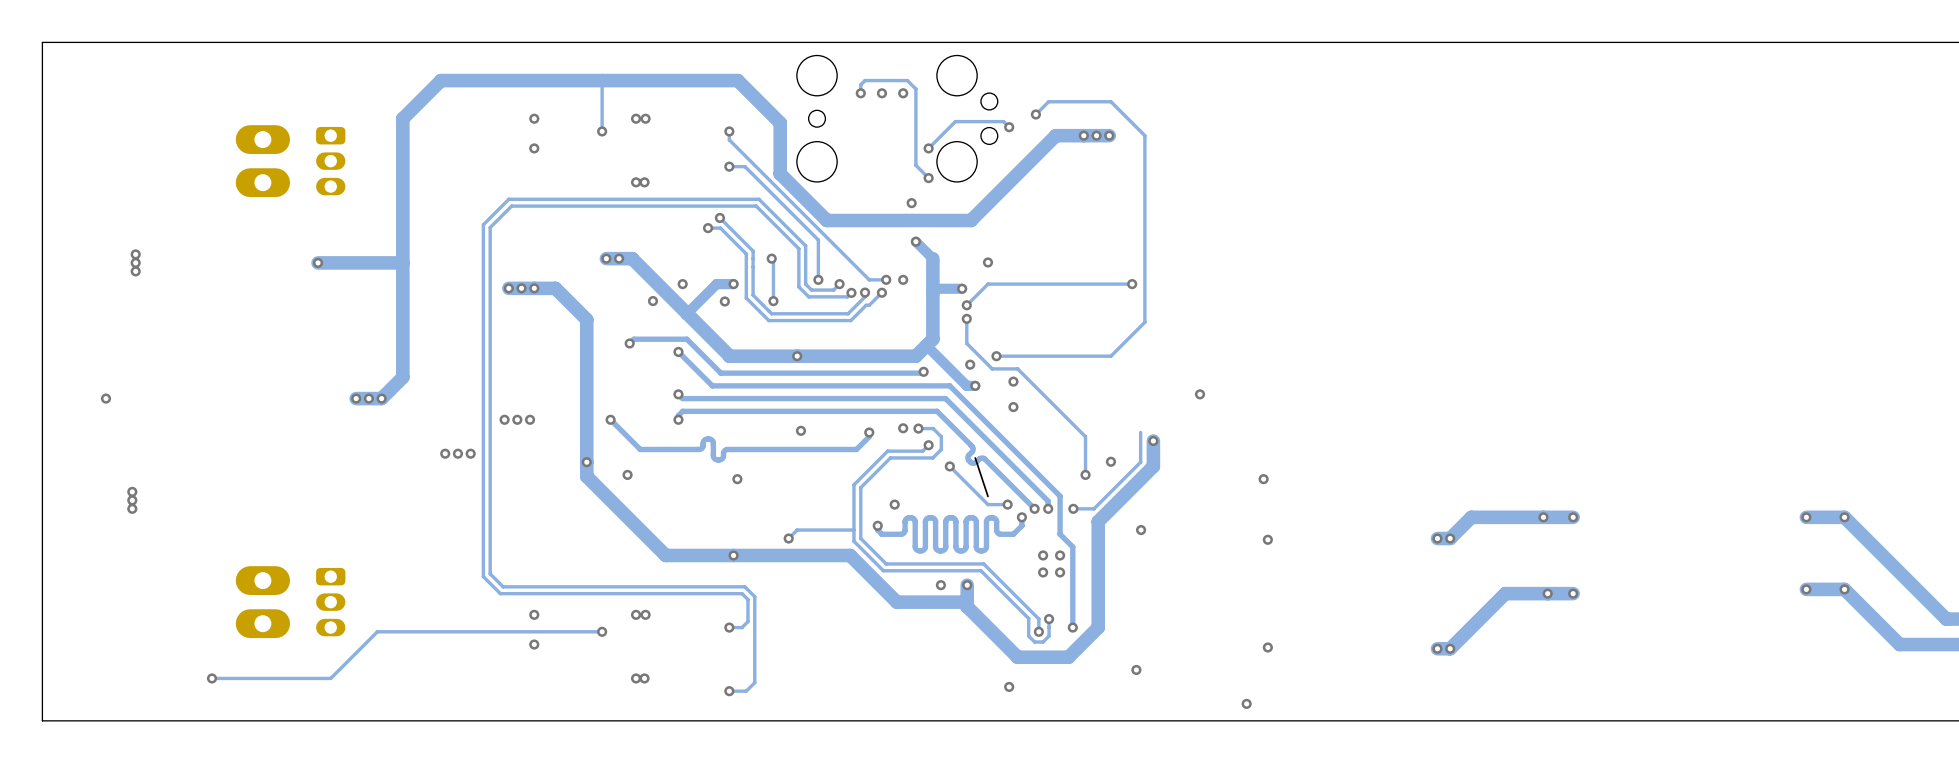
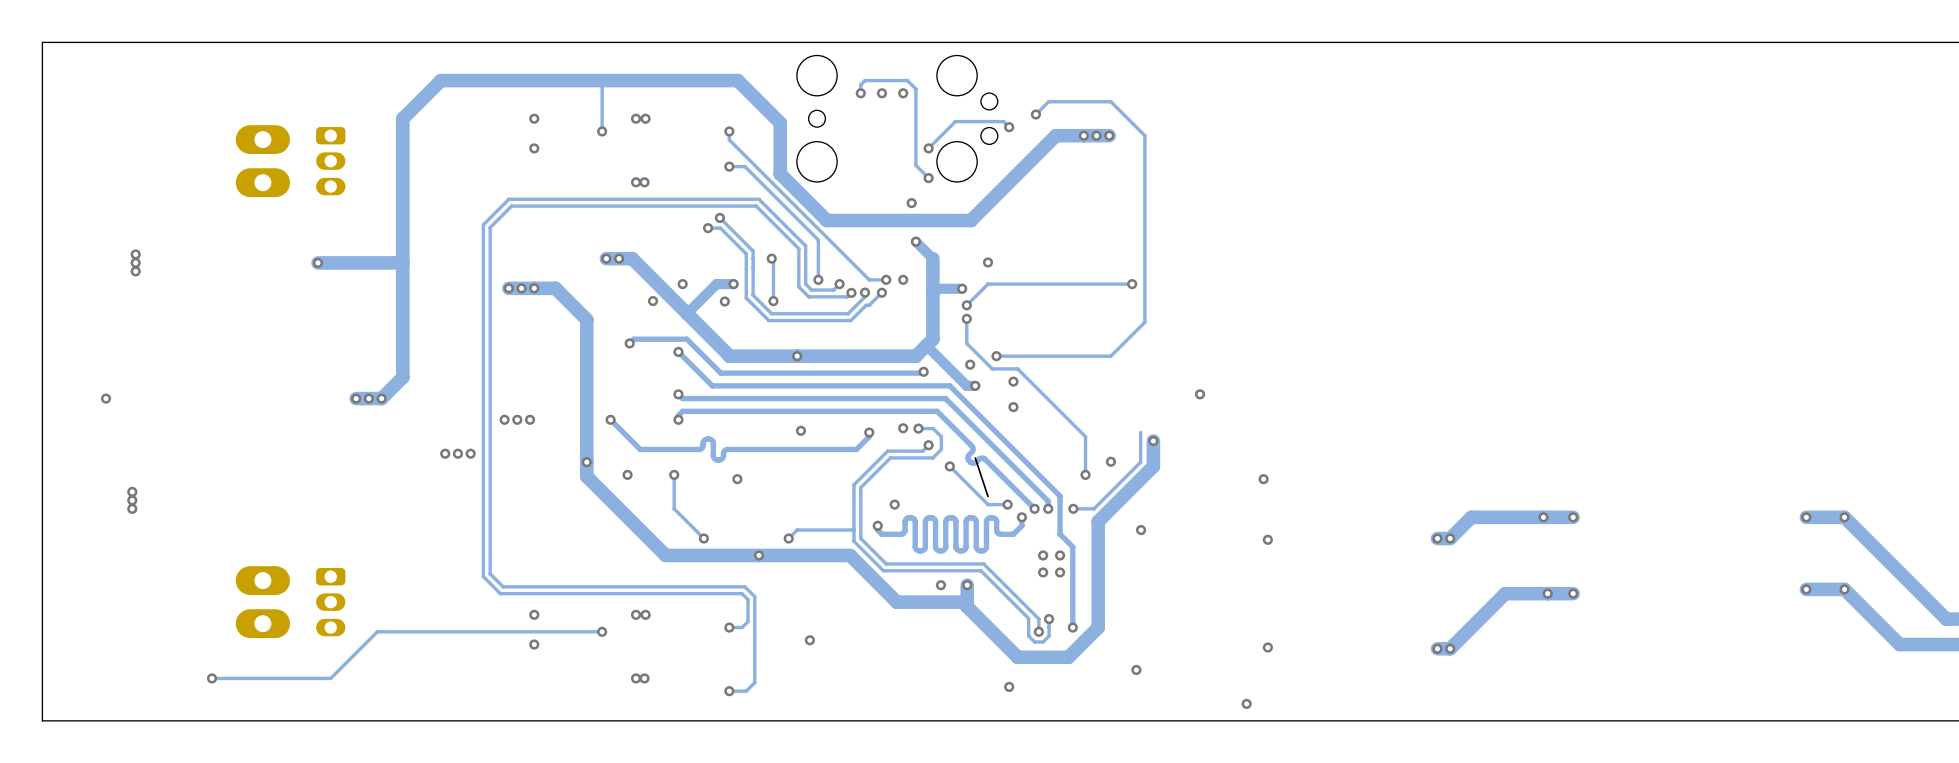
track: none -> (674, 474) (674, 508) (703, 538)
via: none -> (674, 474)
via: none -> (703, 538)
via: (733, 555) -> none
via: none -> (759, 555)
via: none -> (809, 640)

